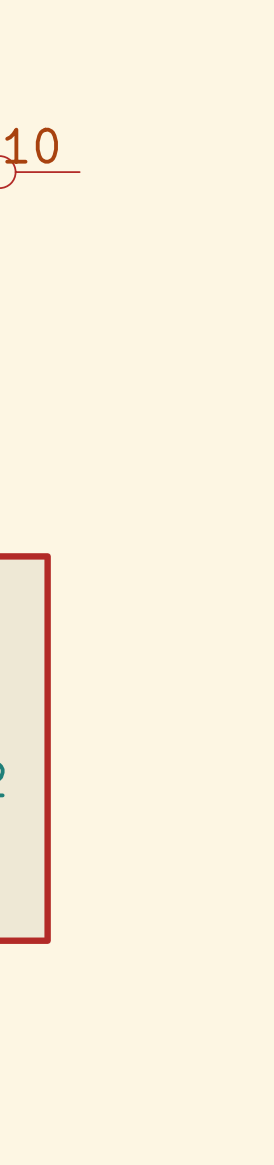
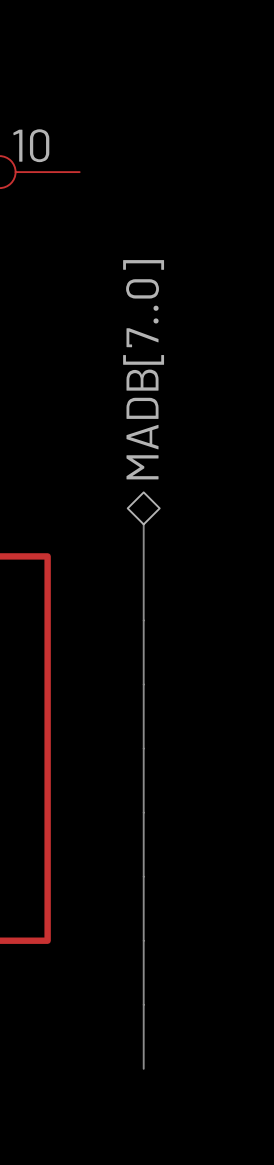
hierarchical label: none -> MADB[7..0] (143, 369)
bus: none -> (143, 524) (143, 1068)

